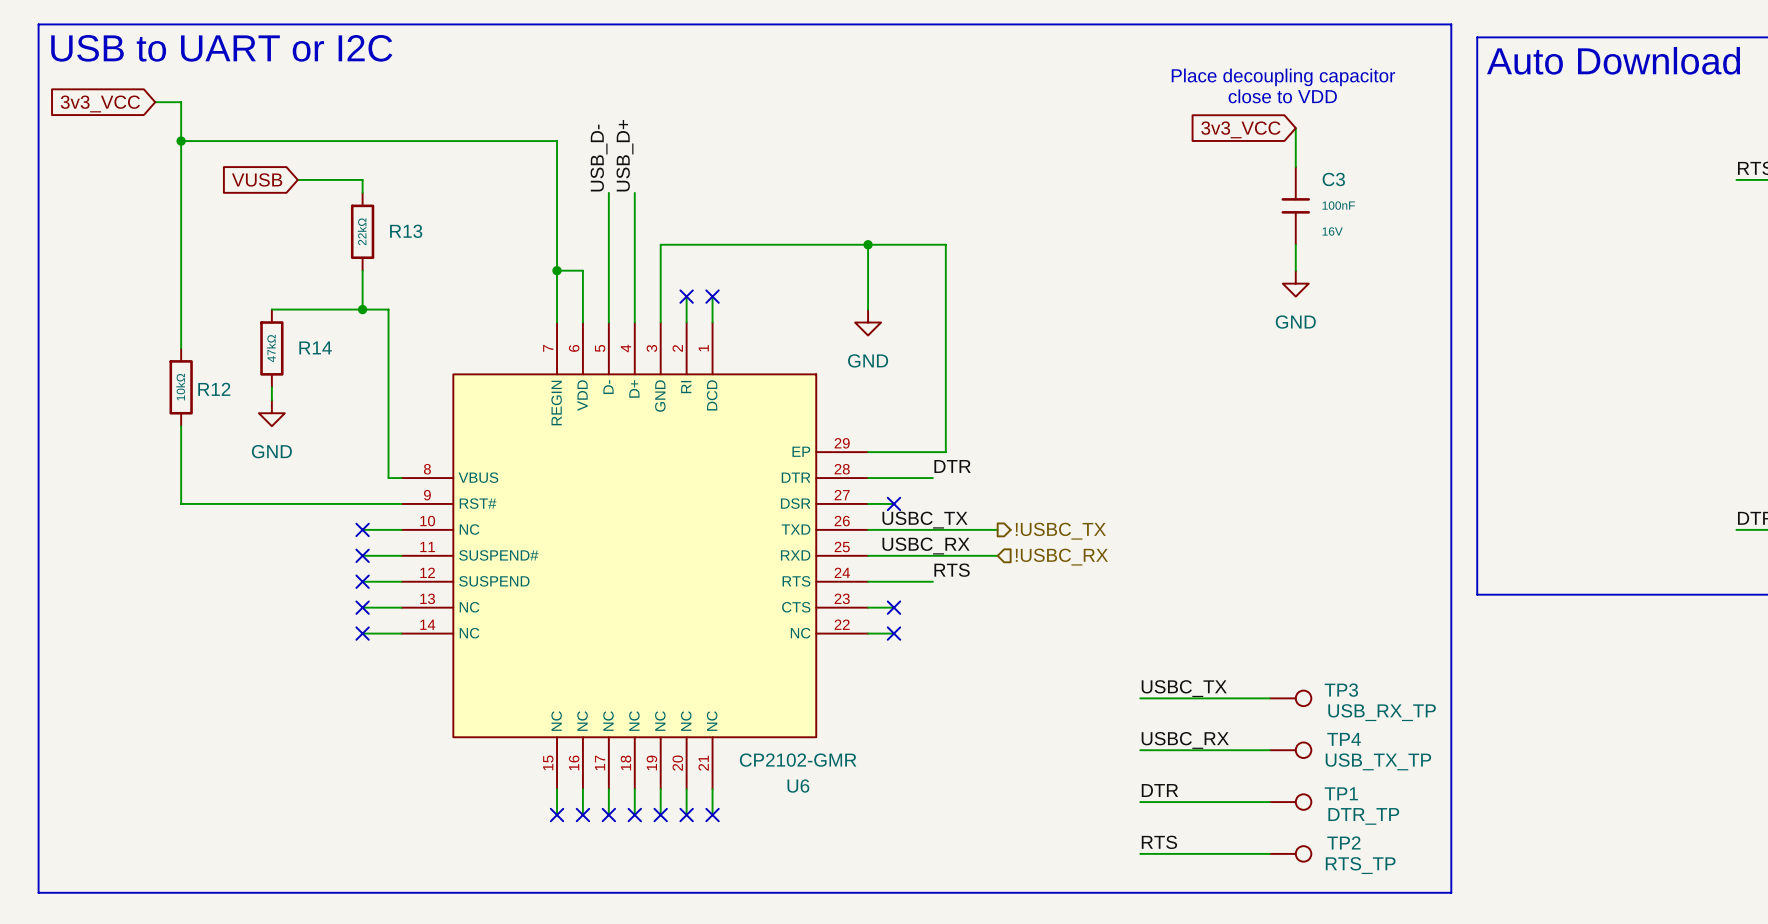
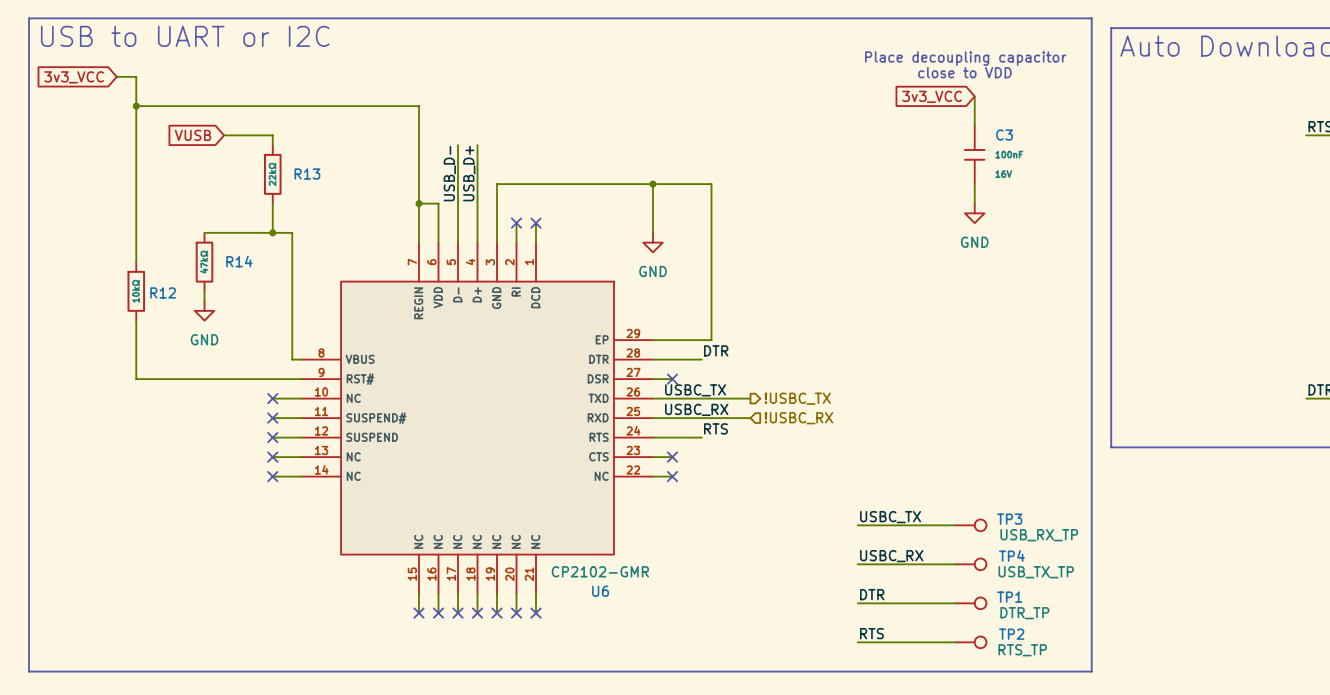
label position: USB_D+ (624, 155) -> USB_D+ (469, 173)
label position: USB_D- (599, 158) -> USB_D- (449, 173)

